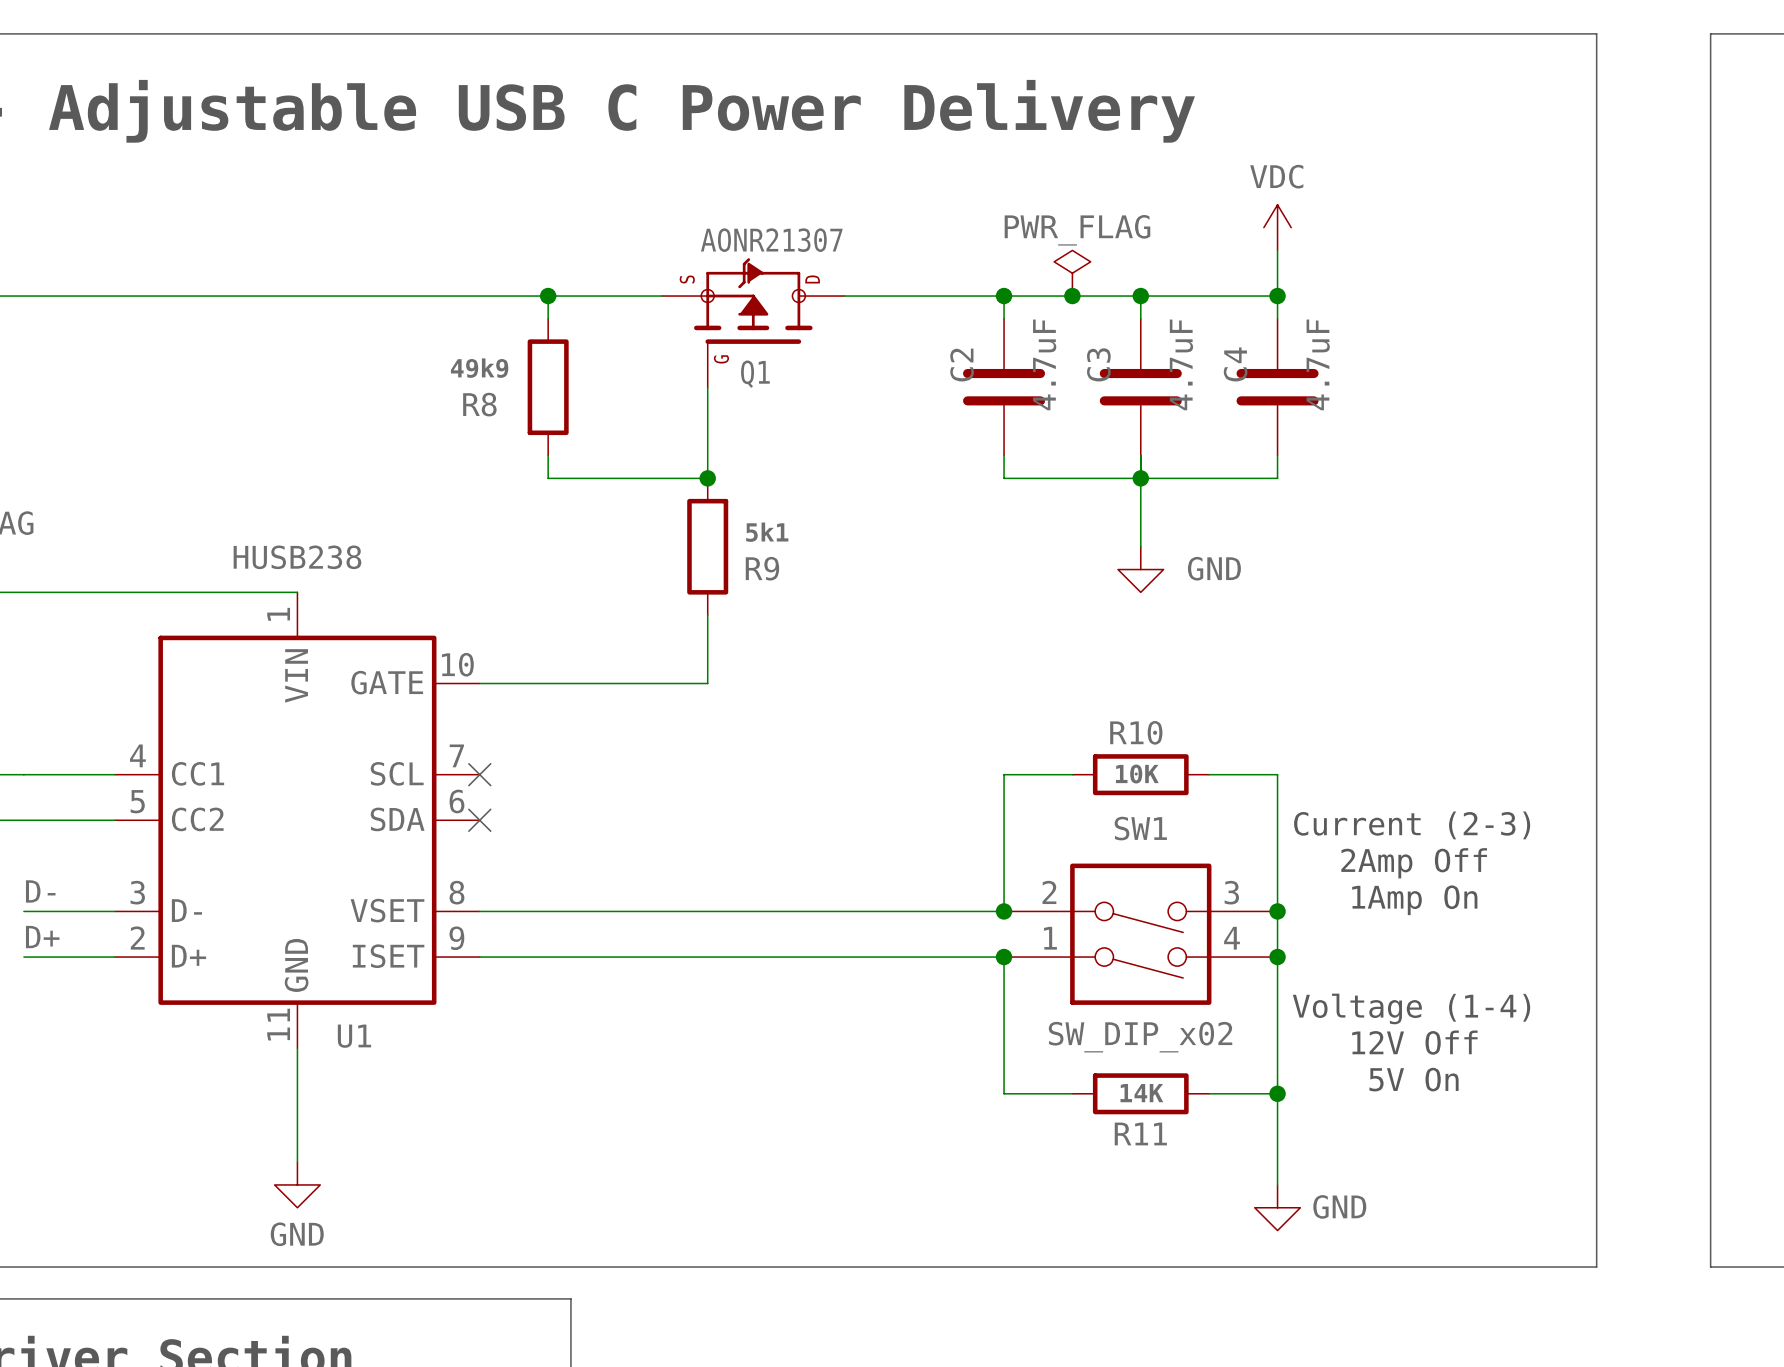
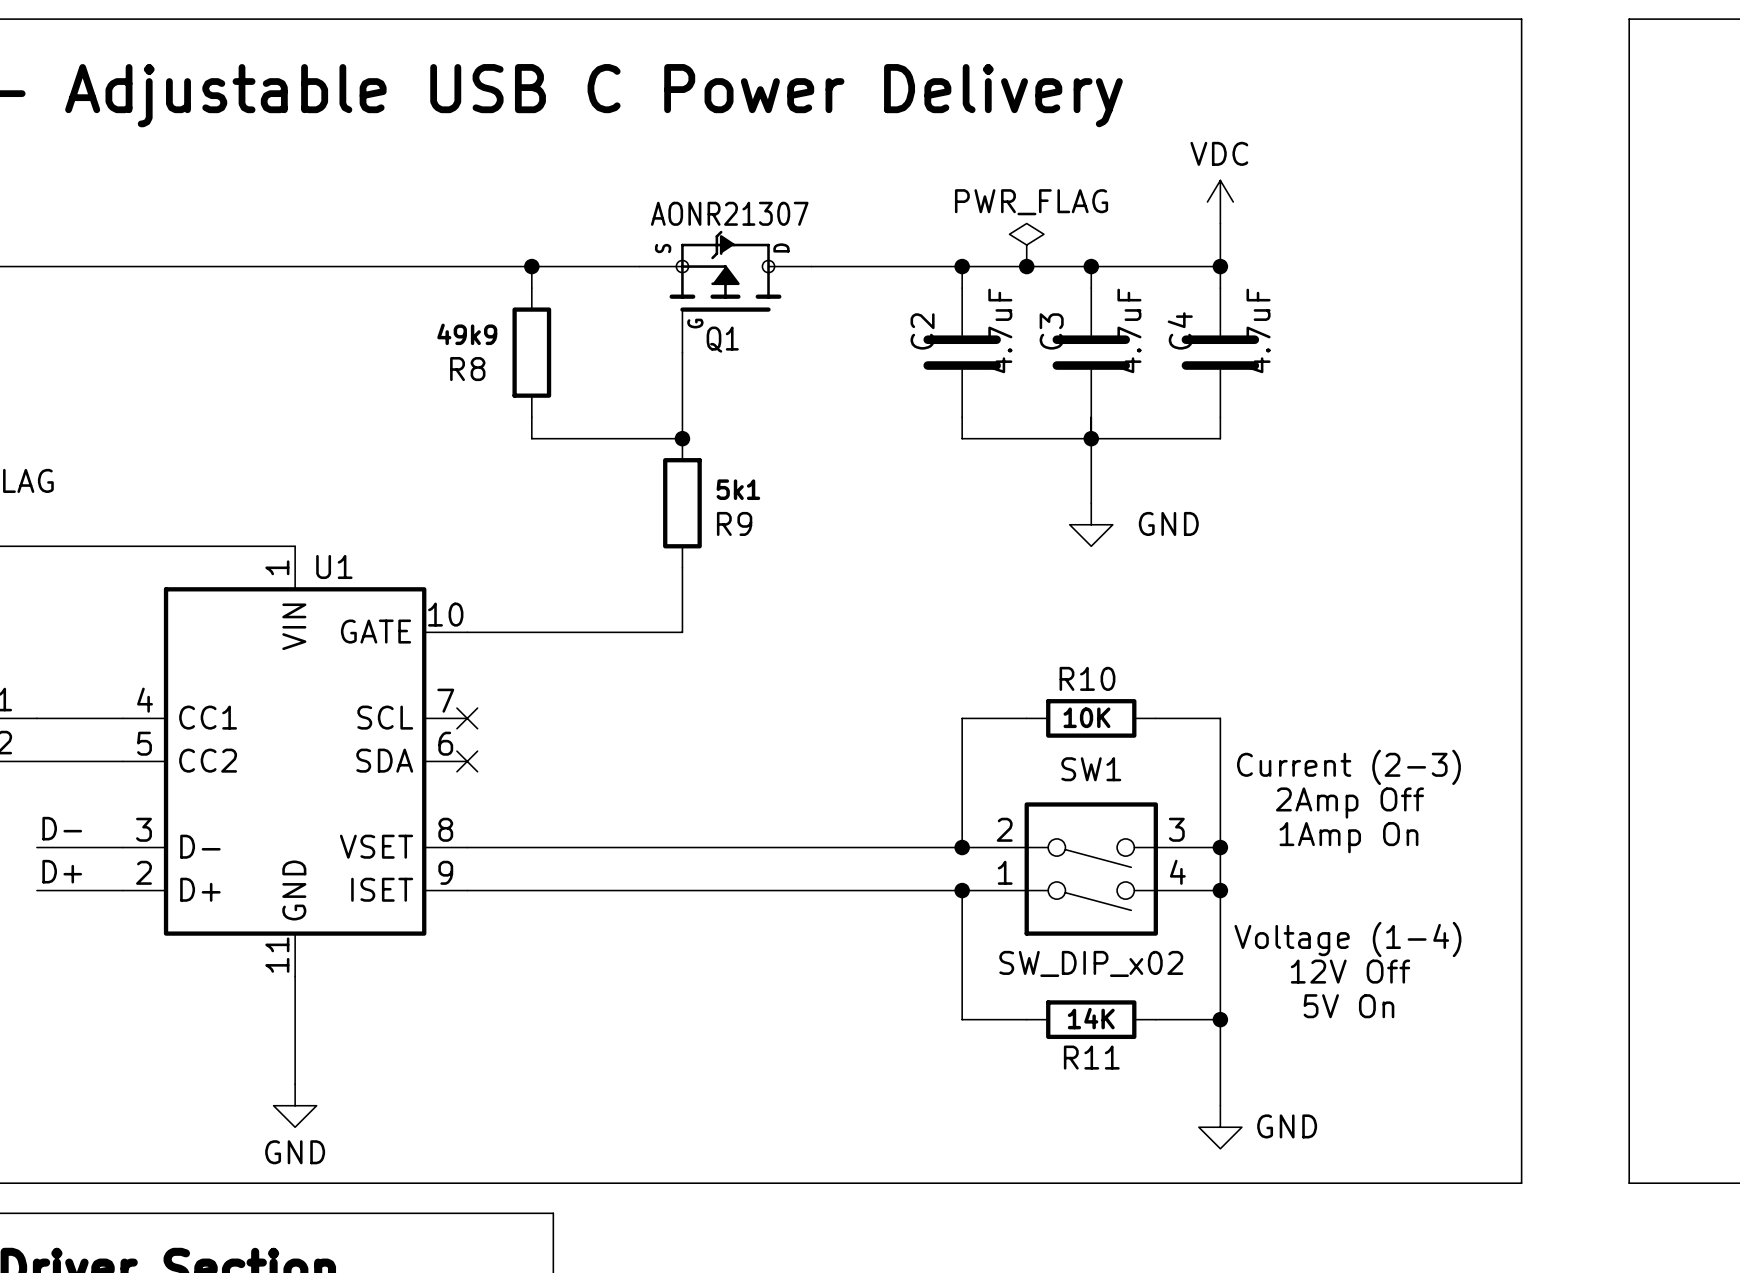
U1 value: HUSB238 (297, 557) -> none
U1 name position: U1 (354, 1036) -> U1 (334, 566)

